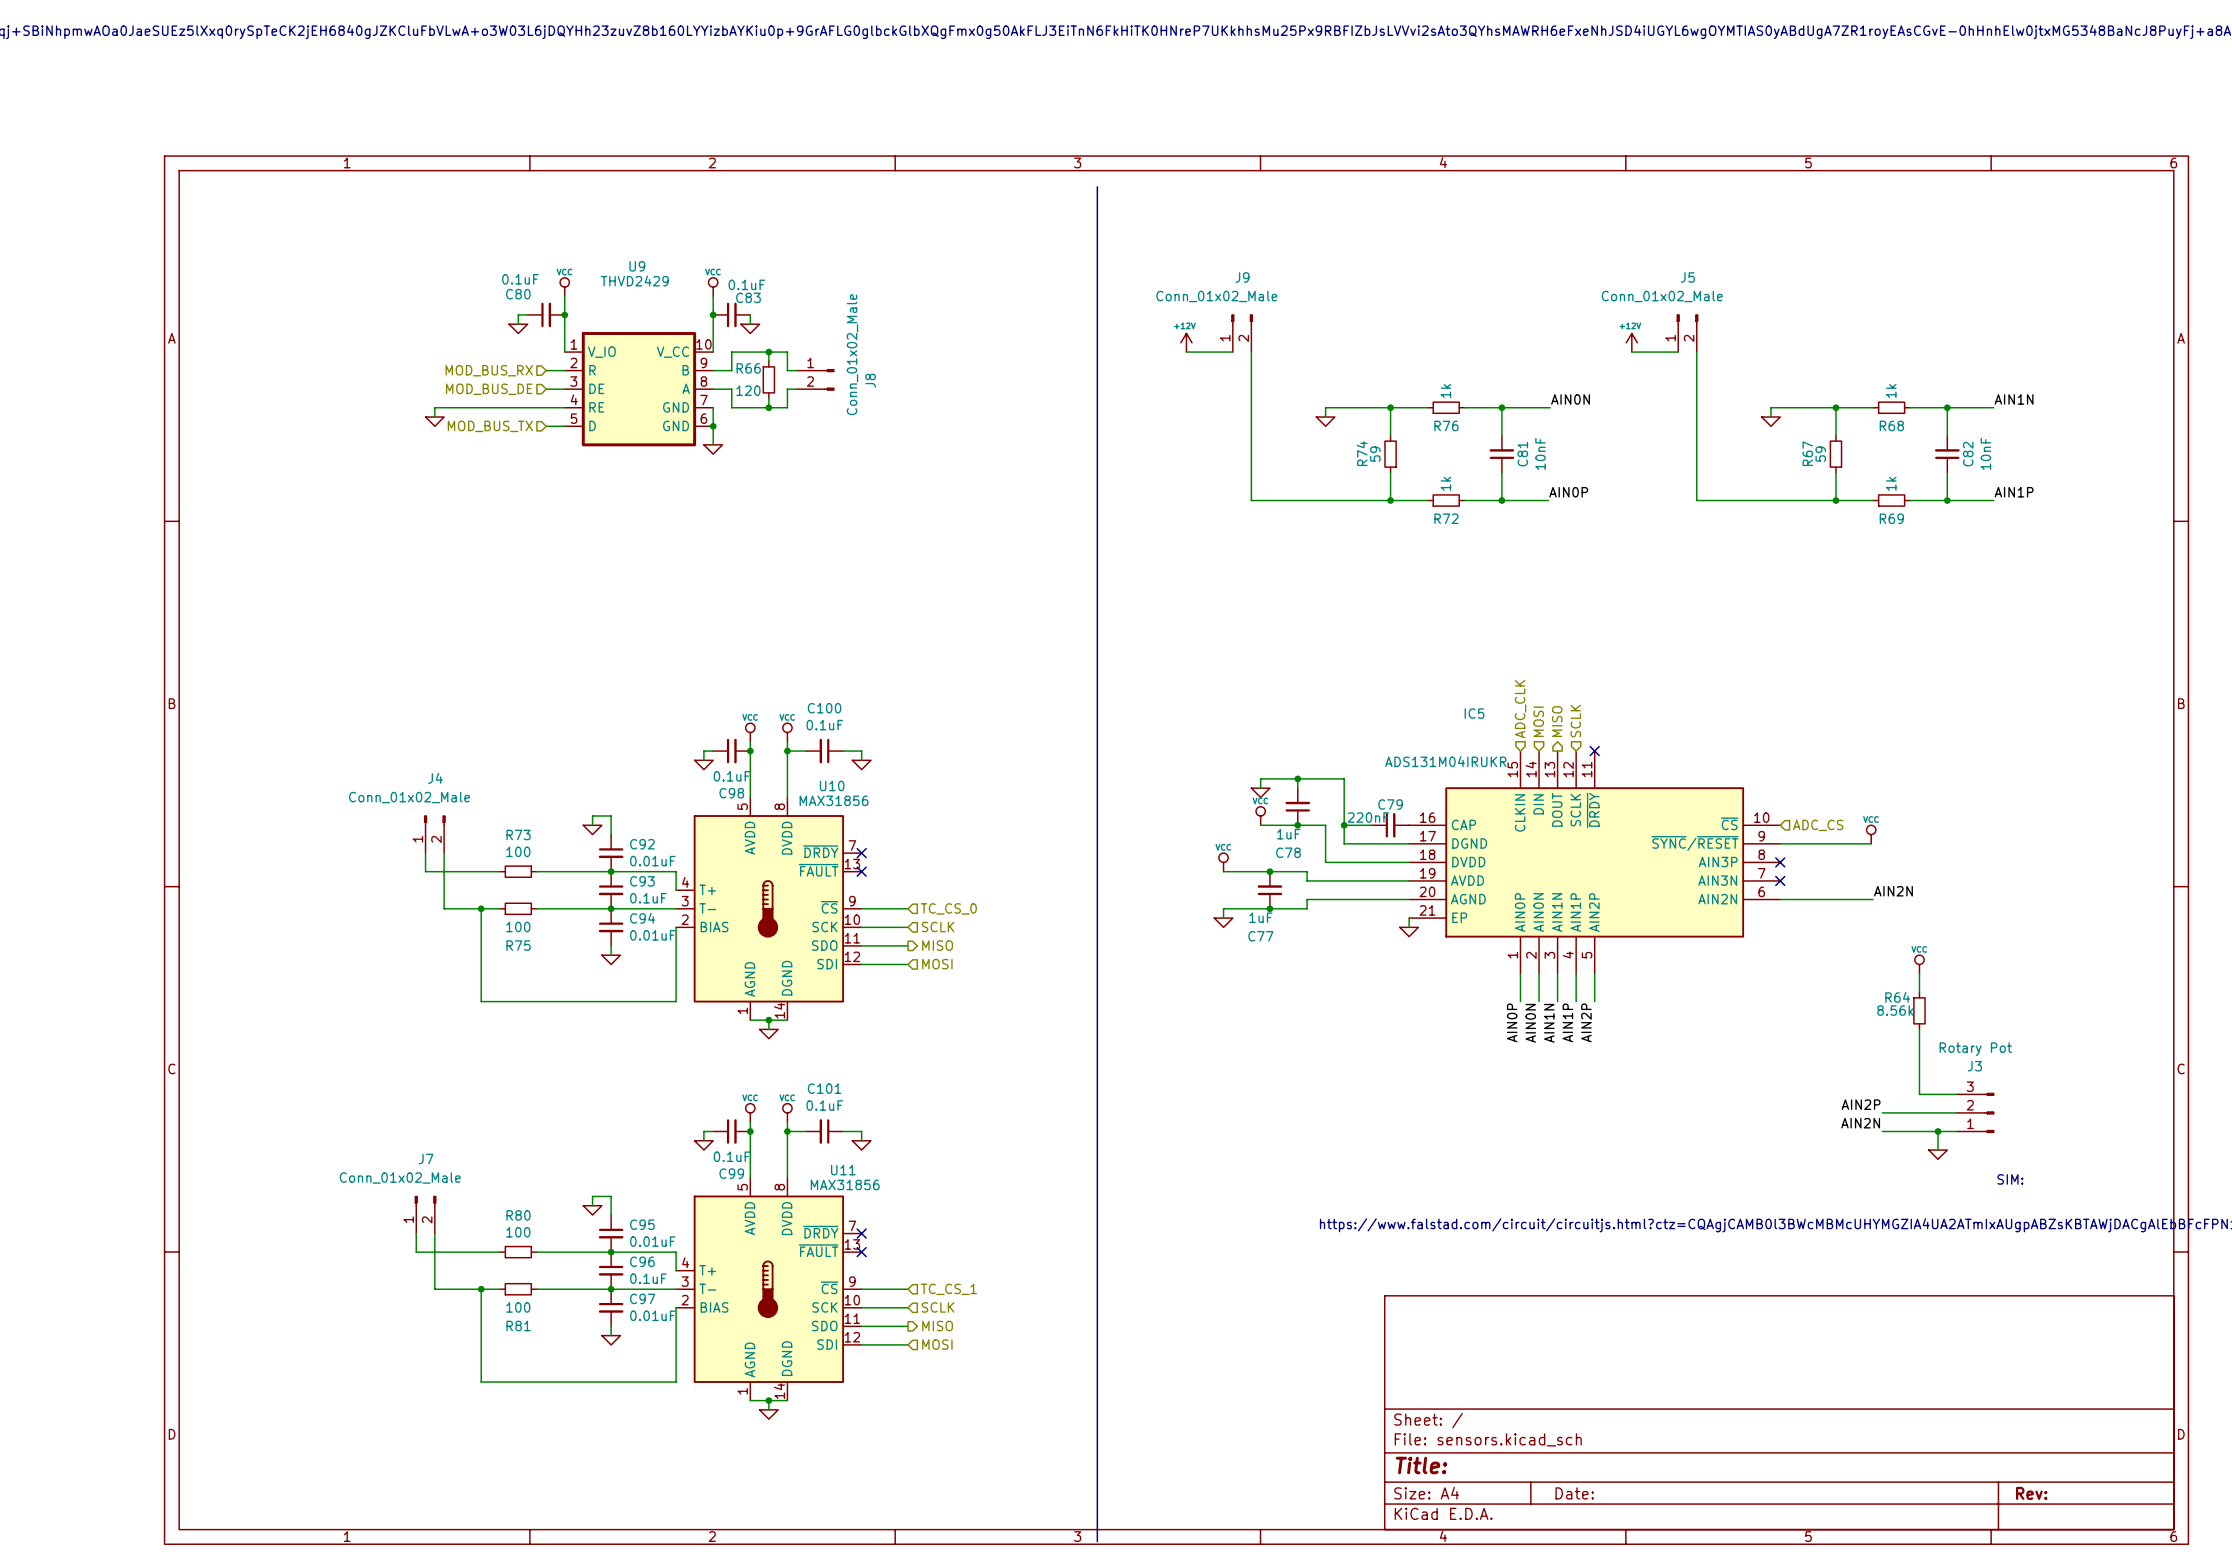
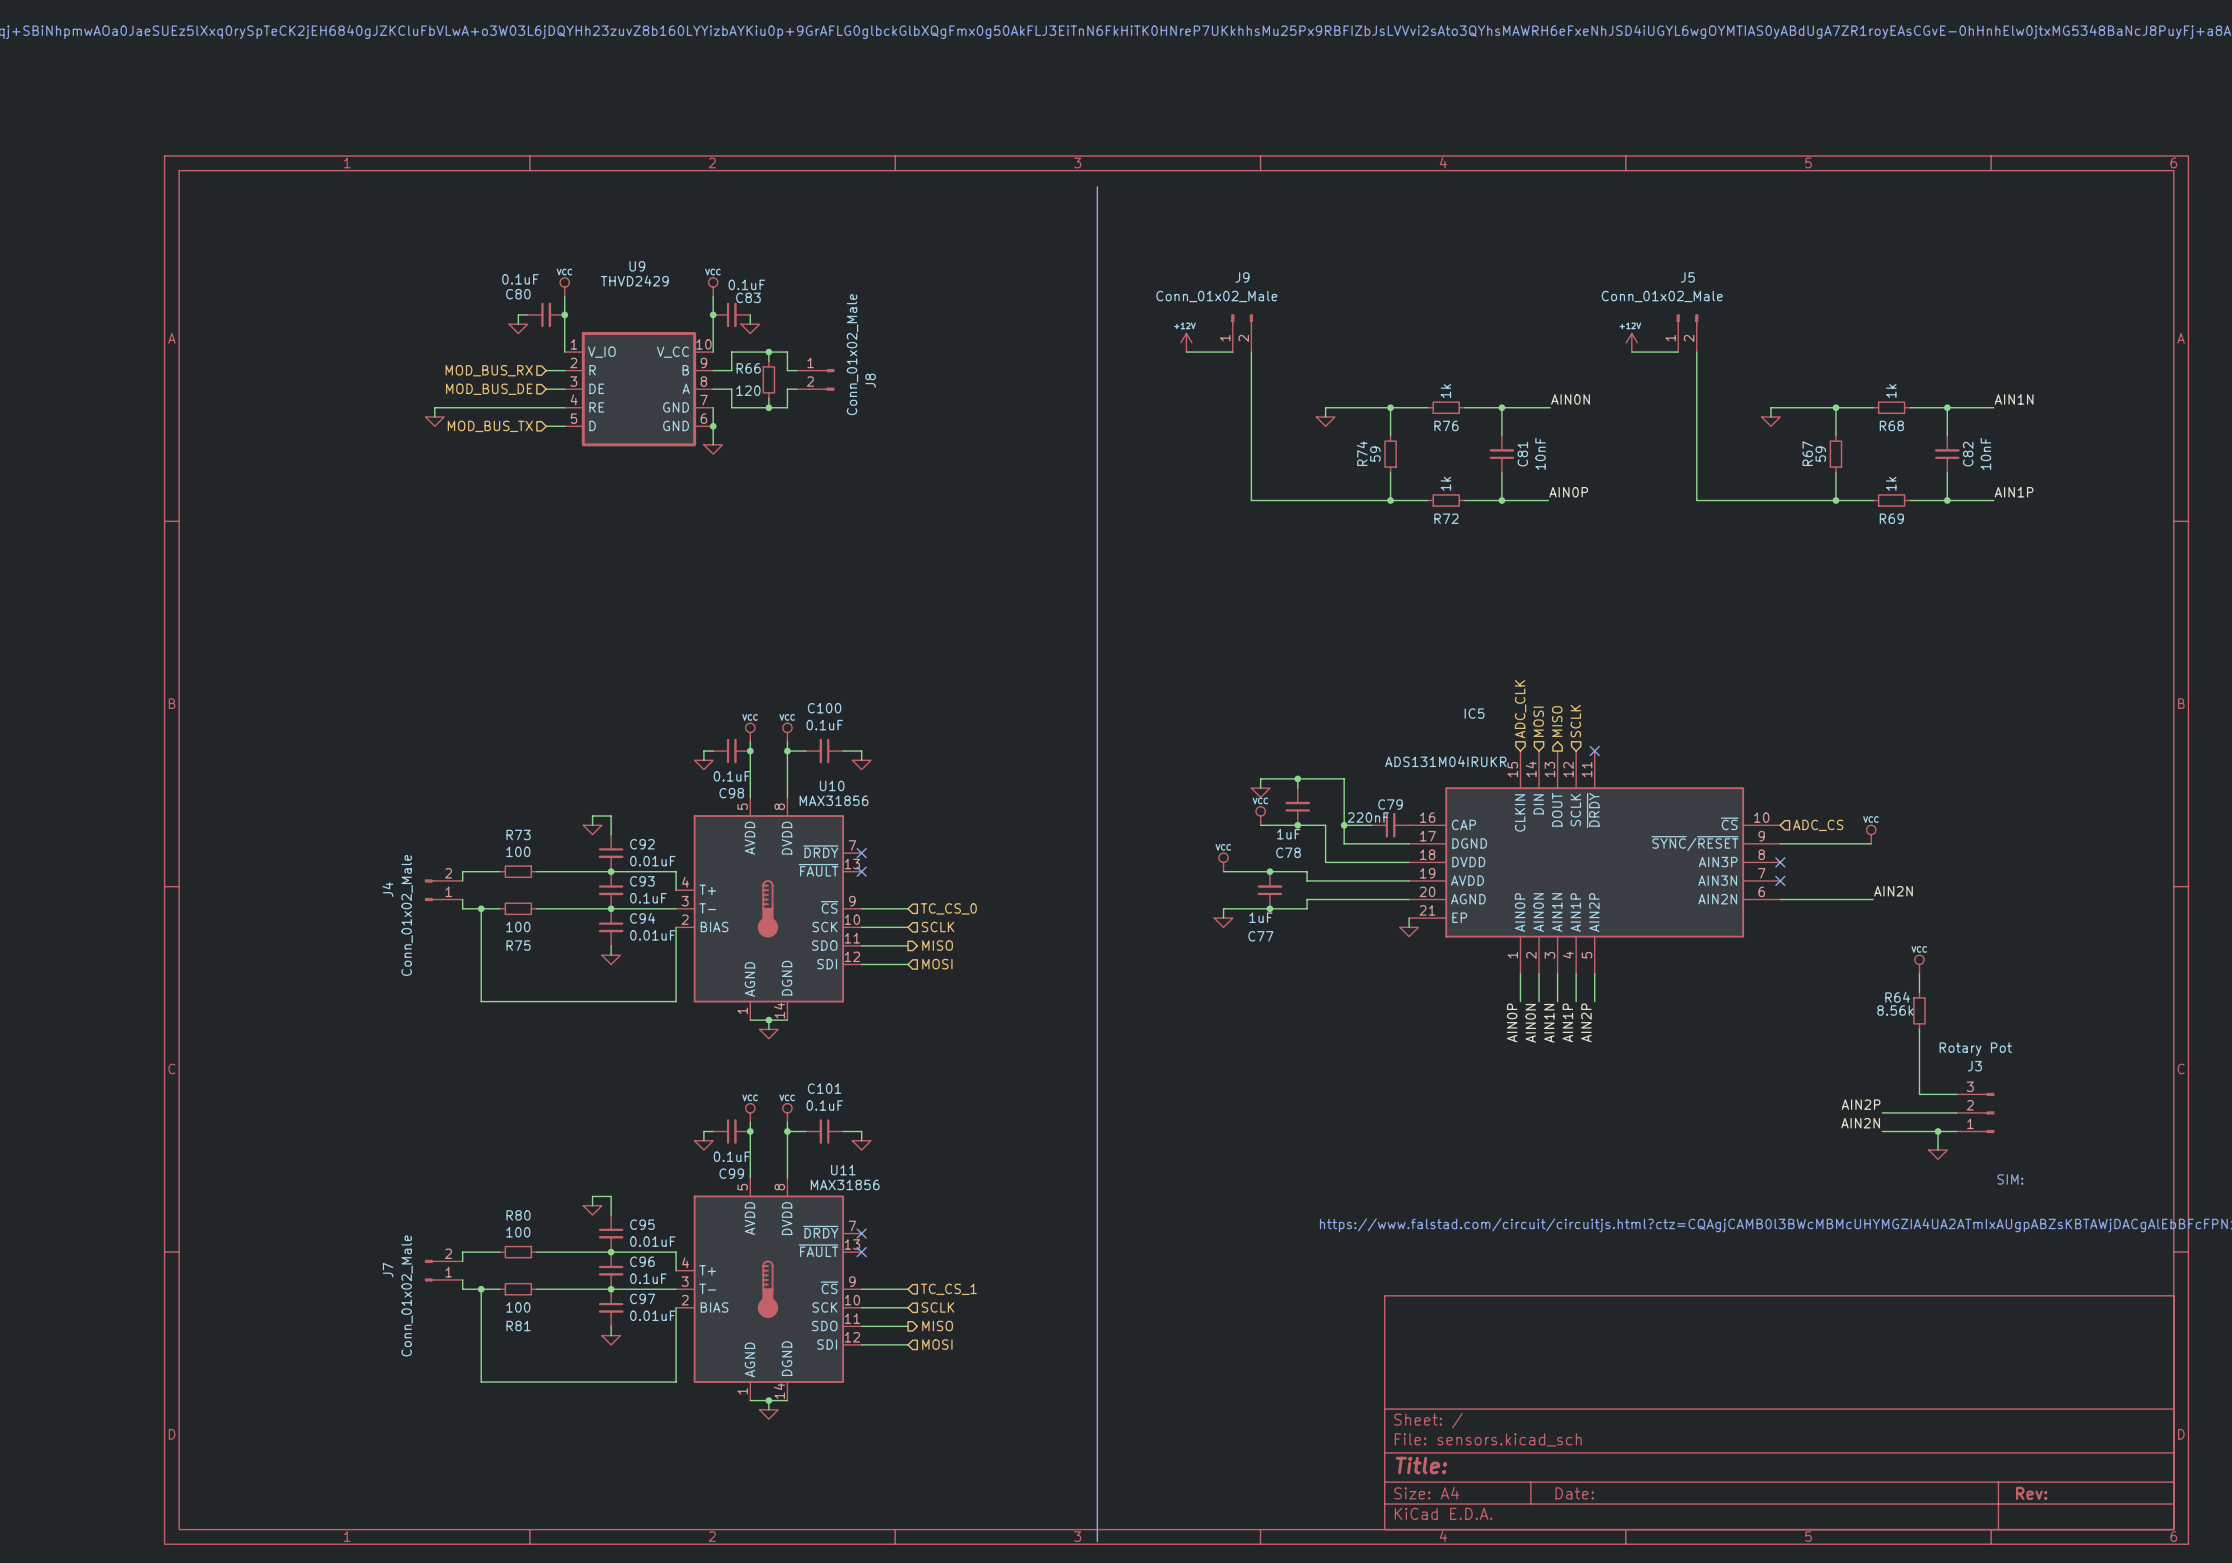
J4 rotation: 0° (434, 820) -> 90° counterclockwise (430, 890)
J4 position: (434, 834) -> (443, 890)
wire: (425, 853) (425, 871) (462, 871) -> (462, 880) (462, 871)
wire: (444, 853) (444, 908) (462, 908) -> (462, 899) (462, 908)
J7 rotation: 0° (425, 1201) -> 90° counterclockwise (430, 1270)
J7 position: (425, 1214) -> (443, 1270)
wire: (416, 1233) (416, 1252) (462, 1252) -> (462, 1261) (462, 1252)
wire: (434, 1233) (434, 1289) (462, 1289) -> (462, 1279) (462, 1289)

